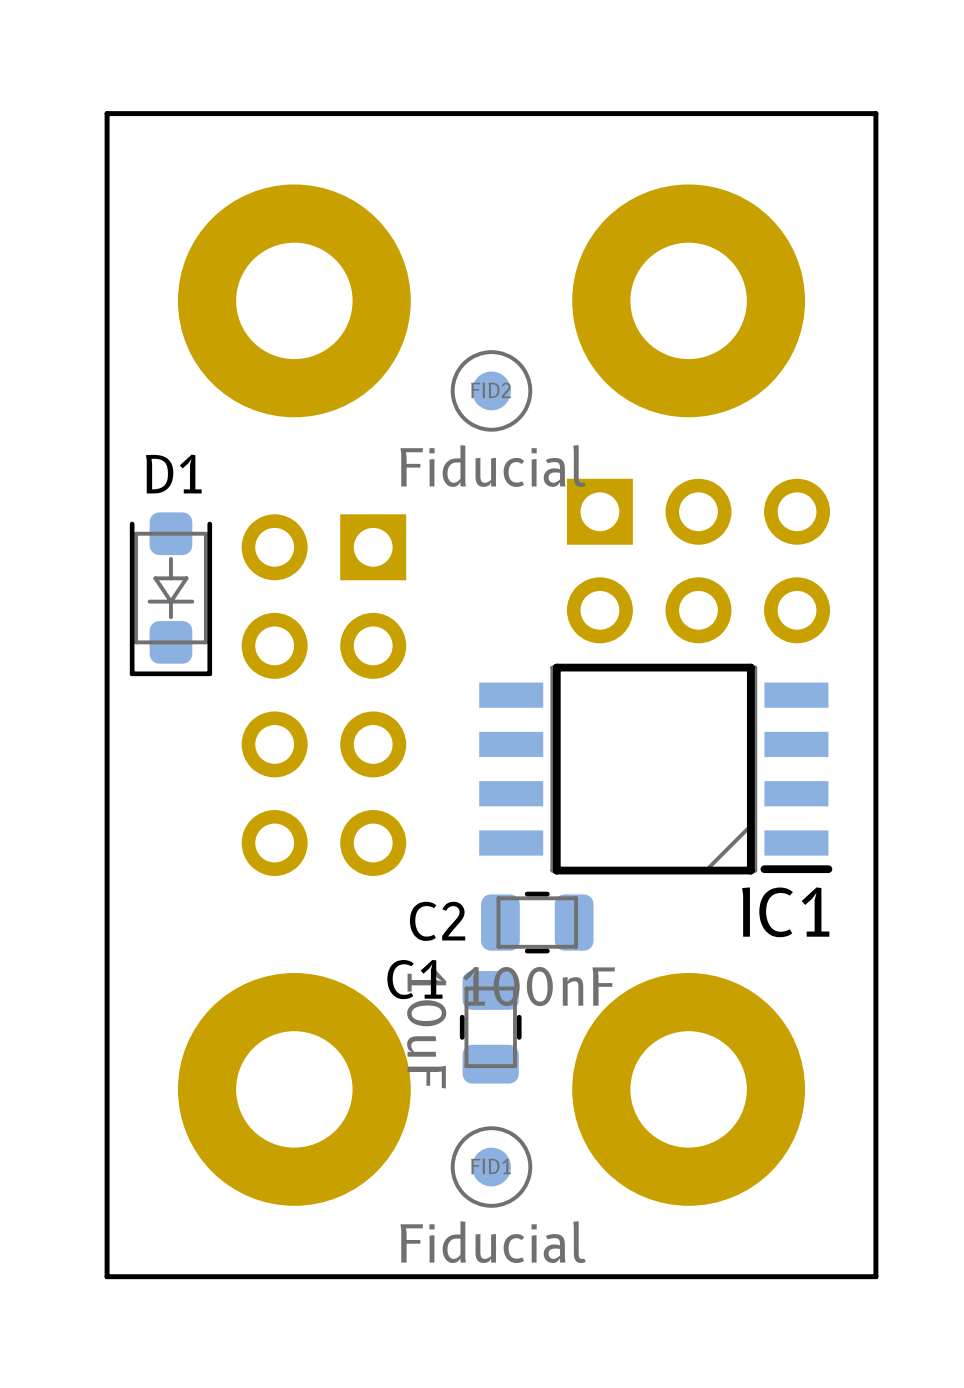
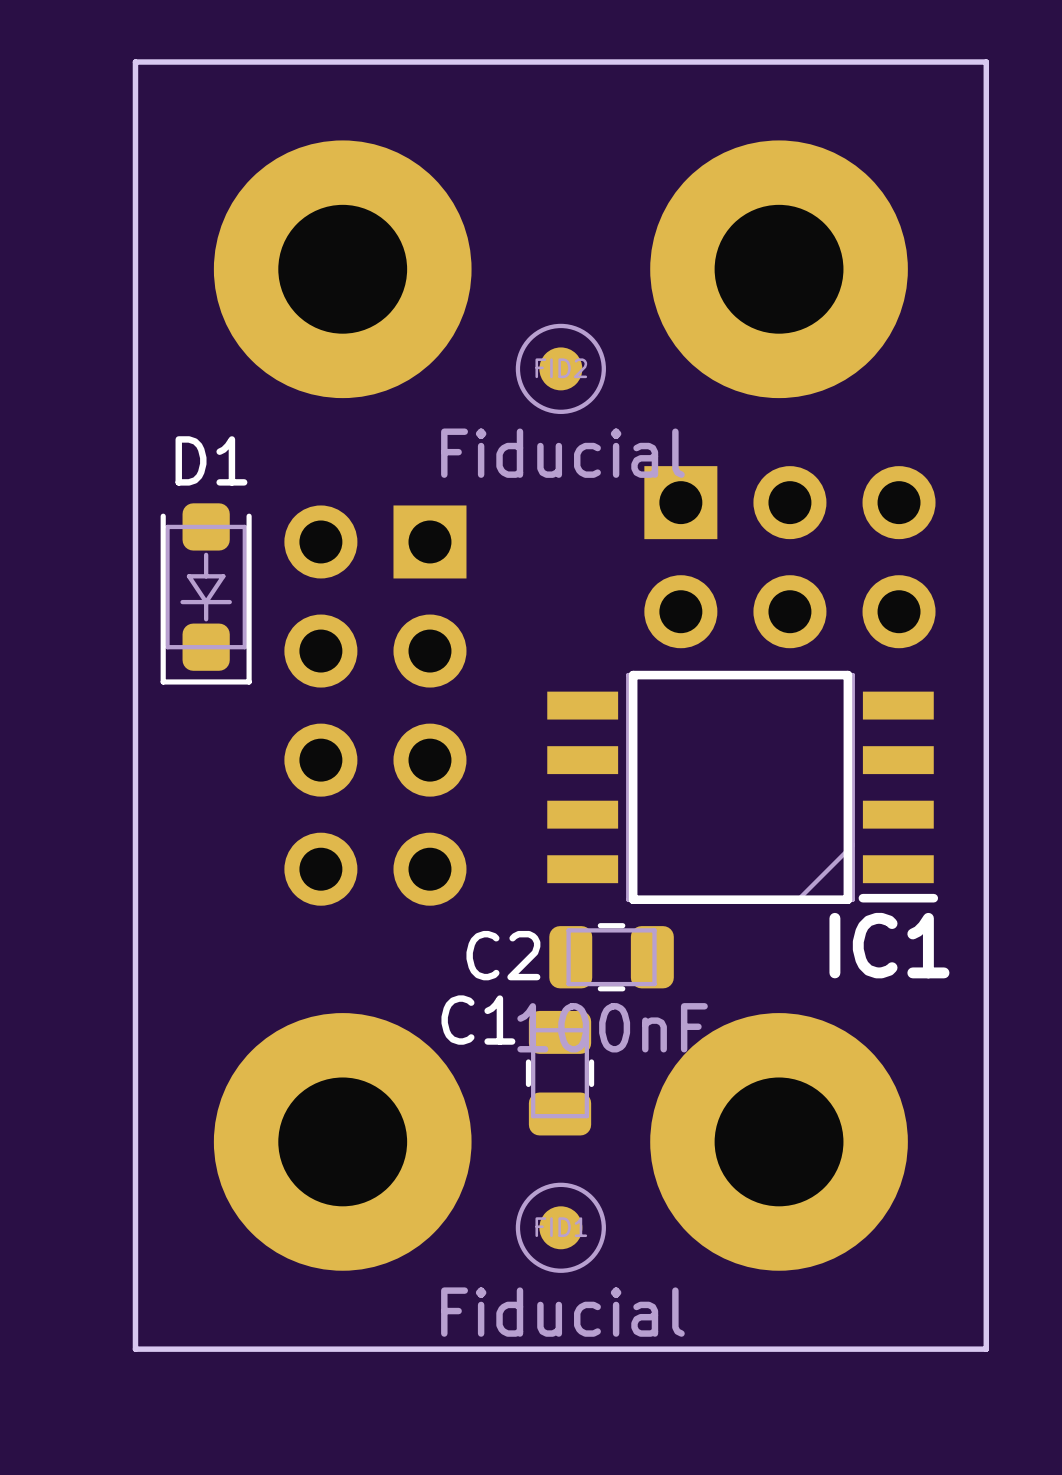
C1 value: 10uF (426, 1029) -> none

